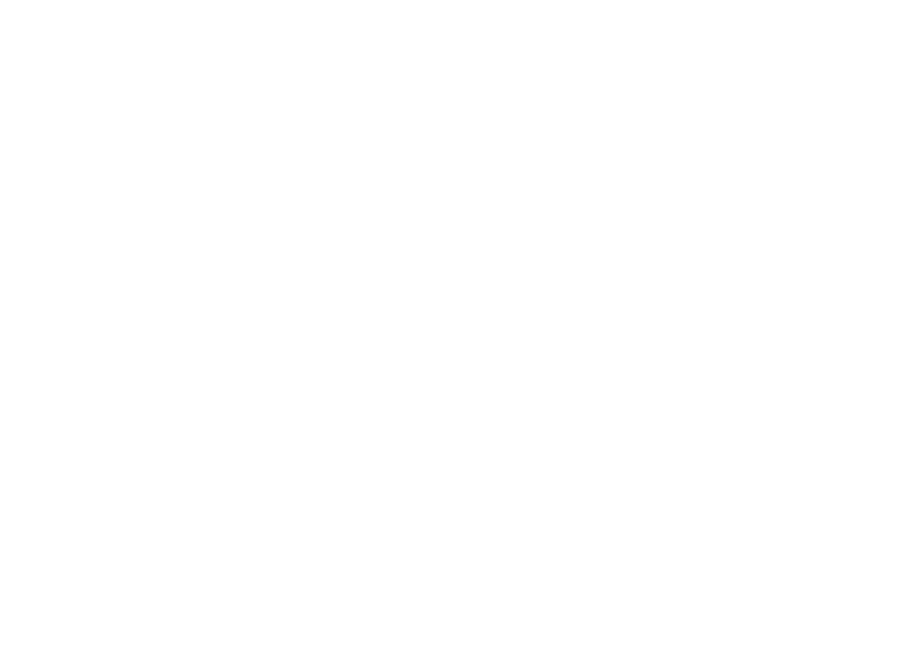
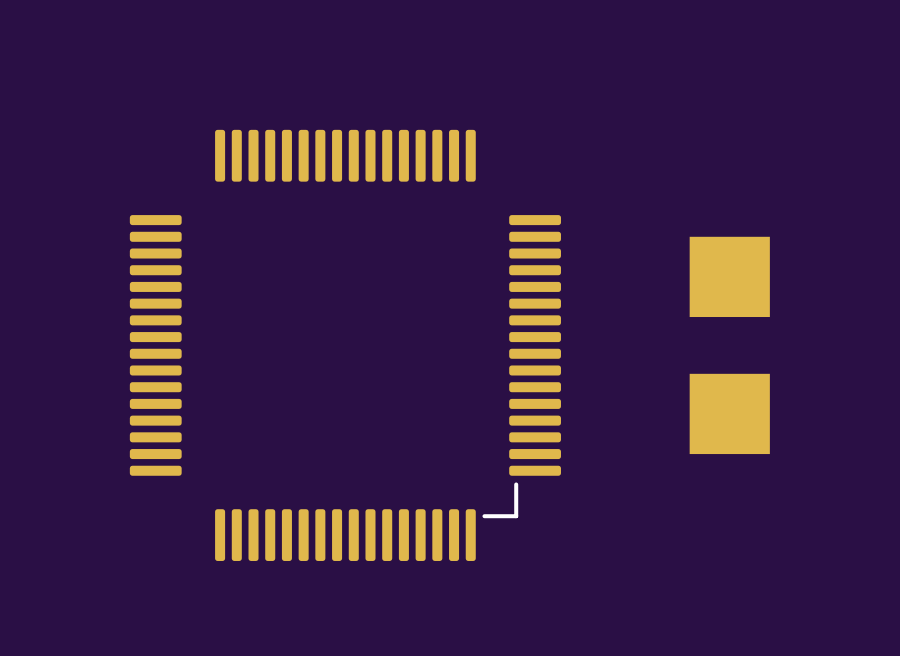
part: none -> (345, 345)
part: none -> (729, 345)

